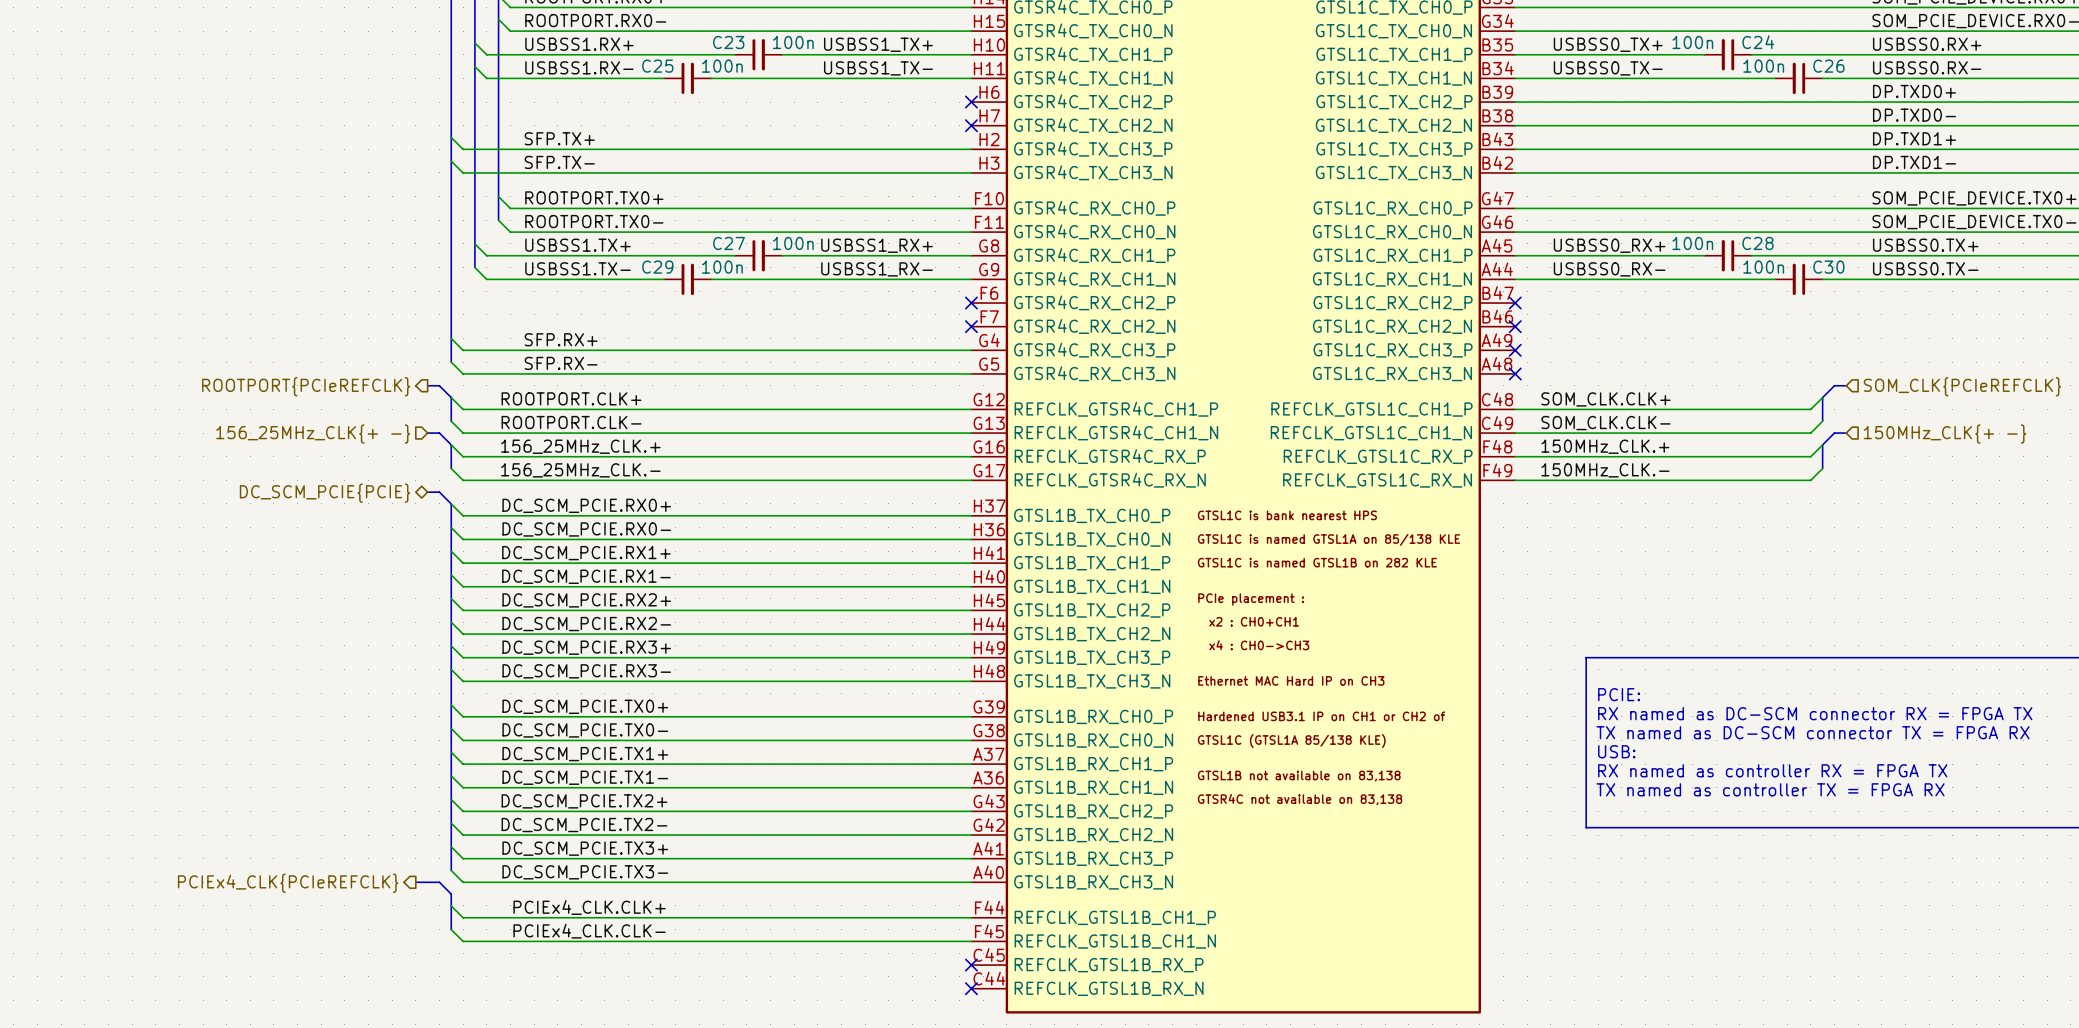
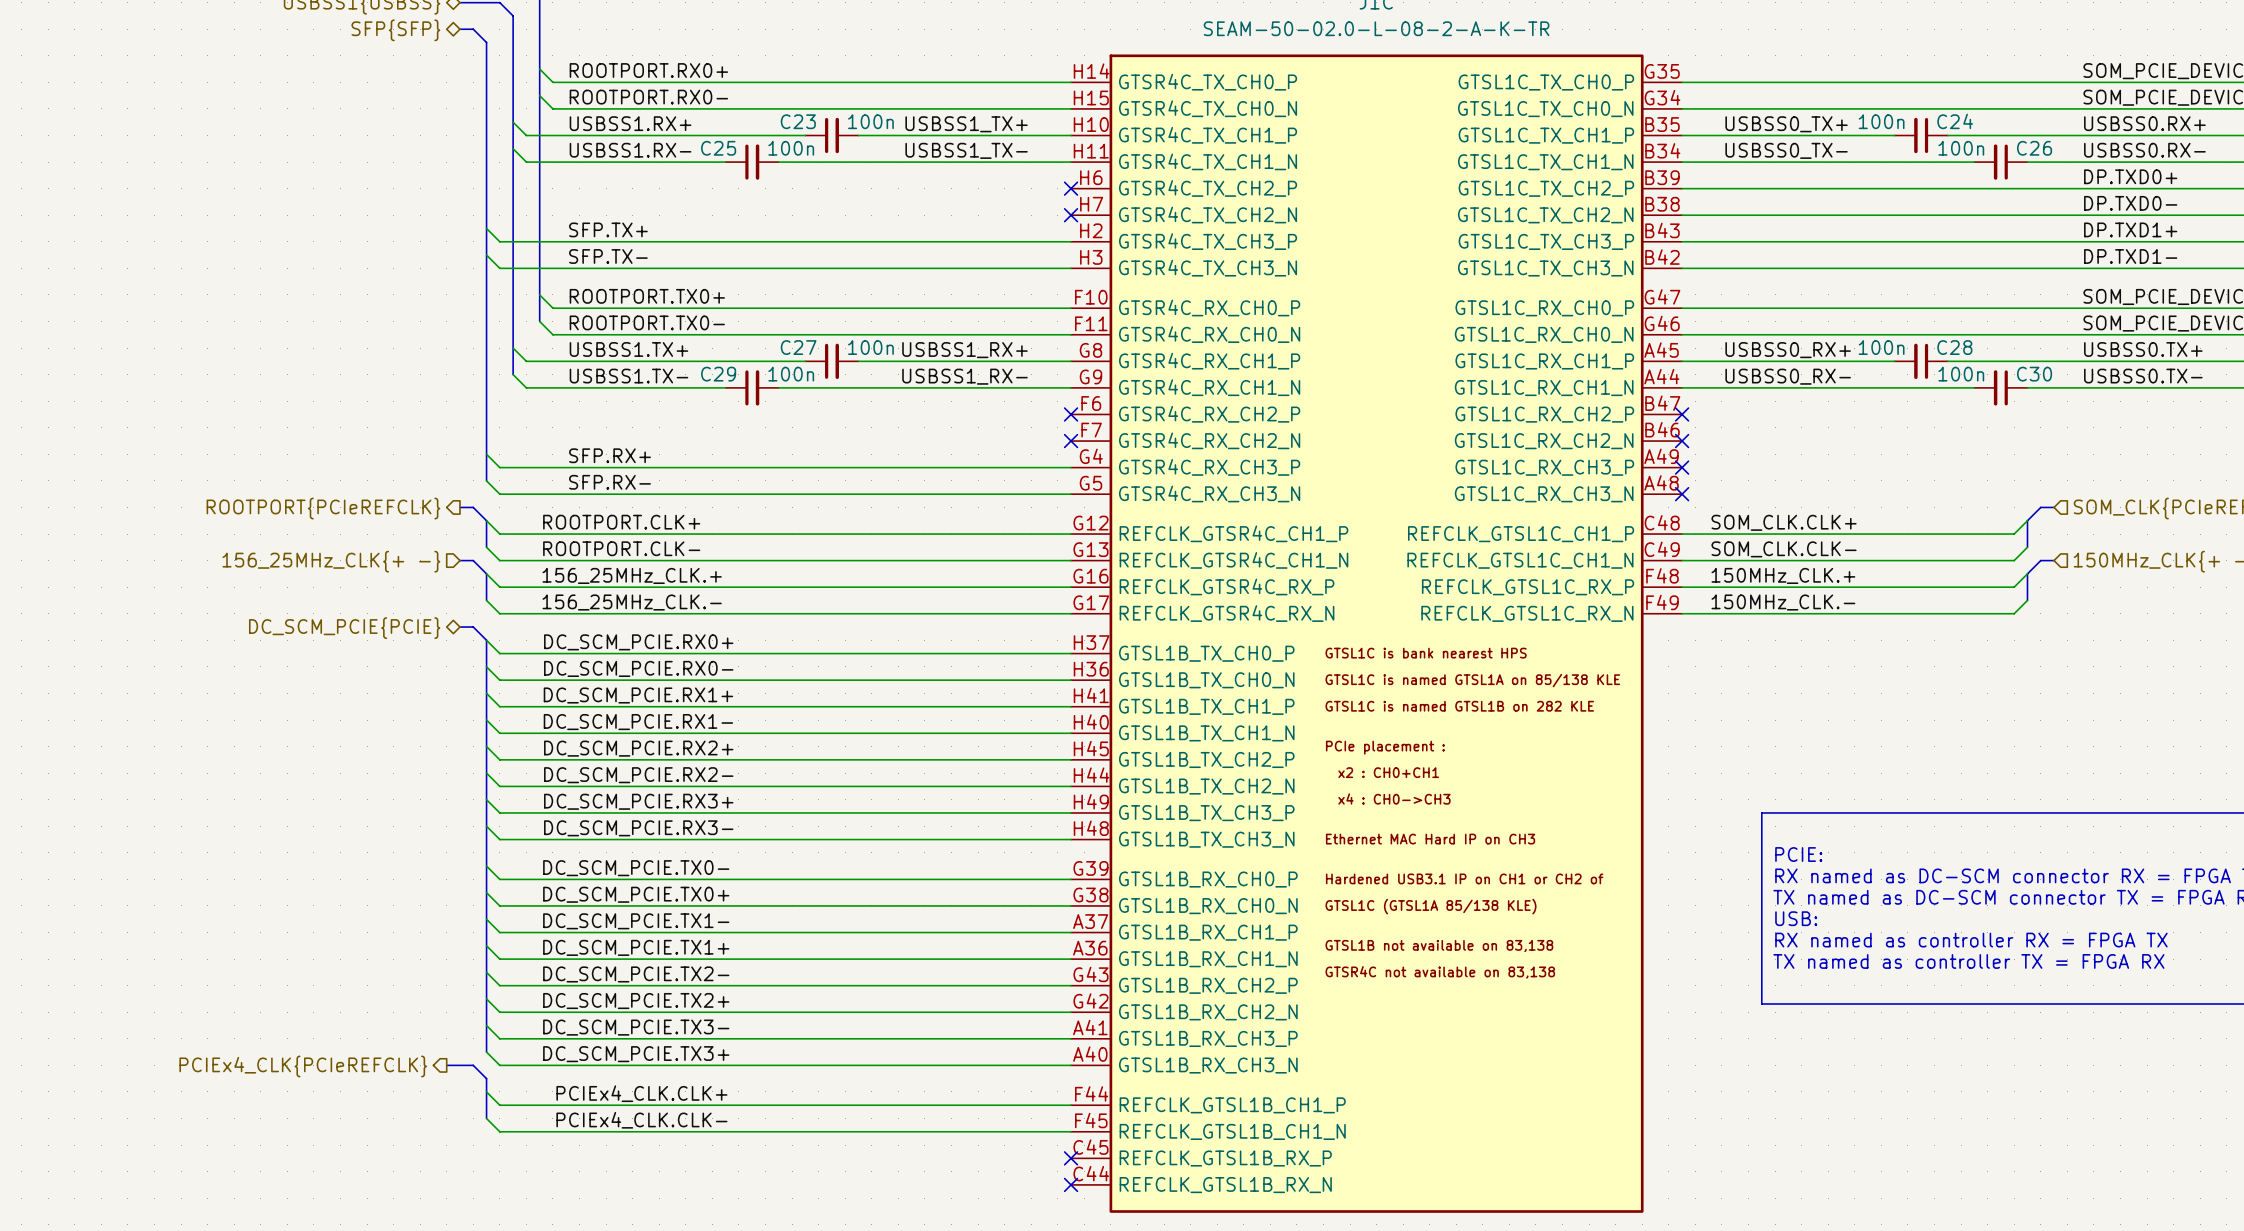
label: DC_SCM_PCIE.TX0+ (585, 706) -> DC_SCM_PCIE.TX0- (636, 868)
label: DC_SCM_PCIE.TX0- (585, 730) -> DC_SCM_PCIE.TX0+ (636, 894)
label: DC_SCM_PCIE.TX1+ (585, 754) -> DC_SCM_PCIE.TX1- (636, 921)
label: DC_SCM_PCIE.TX1- (585, 777) -> DC_SCM_PCIE.TX1+ (636, 947)
label: DC_SCM_PCIE.TX2+ (584, 801) -> DC_SCM_PCIE.TX2- (636, 974)
label: DC_SCM_PCIE.TX2- (584, 825) -> DC_SCM_PCIE.TX2+ (636, 1001)
label: DC_SCM_PCIE.TX3+ (585, 848) -> DC_SCM_PCIE.TX3- (636, 1027)
label: DC_SCM_PCIE.TX3- (585, 872) -> DC_SCM_PCIE.TX3+ (636, 1054)

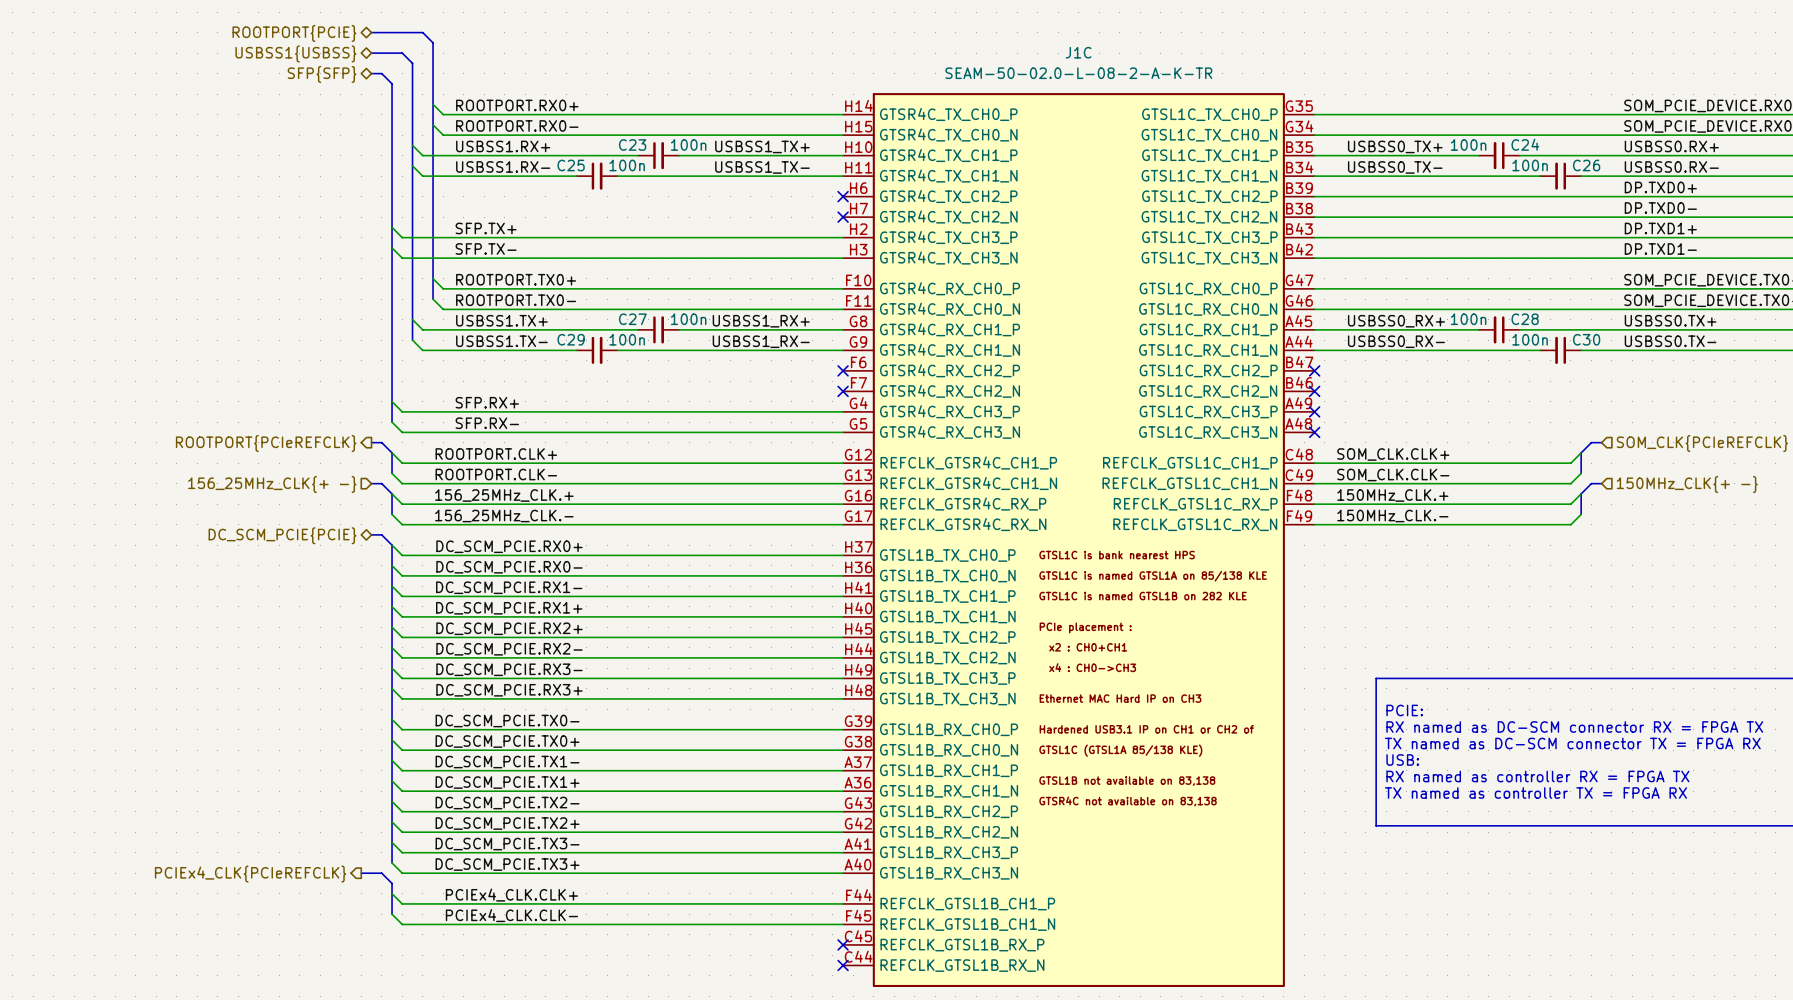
label: DC_SCM_PCIE.RX1+ (638, 695) -> DC_SCM_PCIE.RX1- (509, 587)
label: DC_SCM_PCIE.RX1- (638, 722) -> DC_SCM_PCIE.RX1+ (509, 608)
label: DC_SCM_PCIE.RX3+ (638, 801) -> DC_SCM_PCIE.RX3- (509, 669)
label: DC_SCM_PCIE.RX3- (638, 828) -> DC_SCM_PCIE.RX3+ (509, 690)

